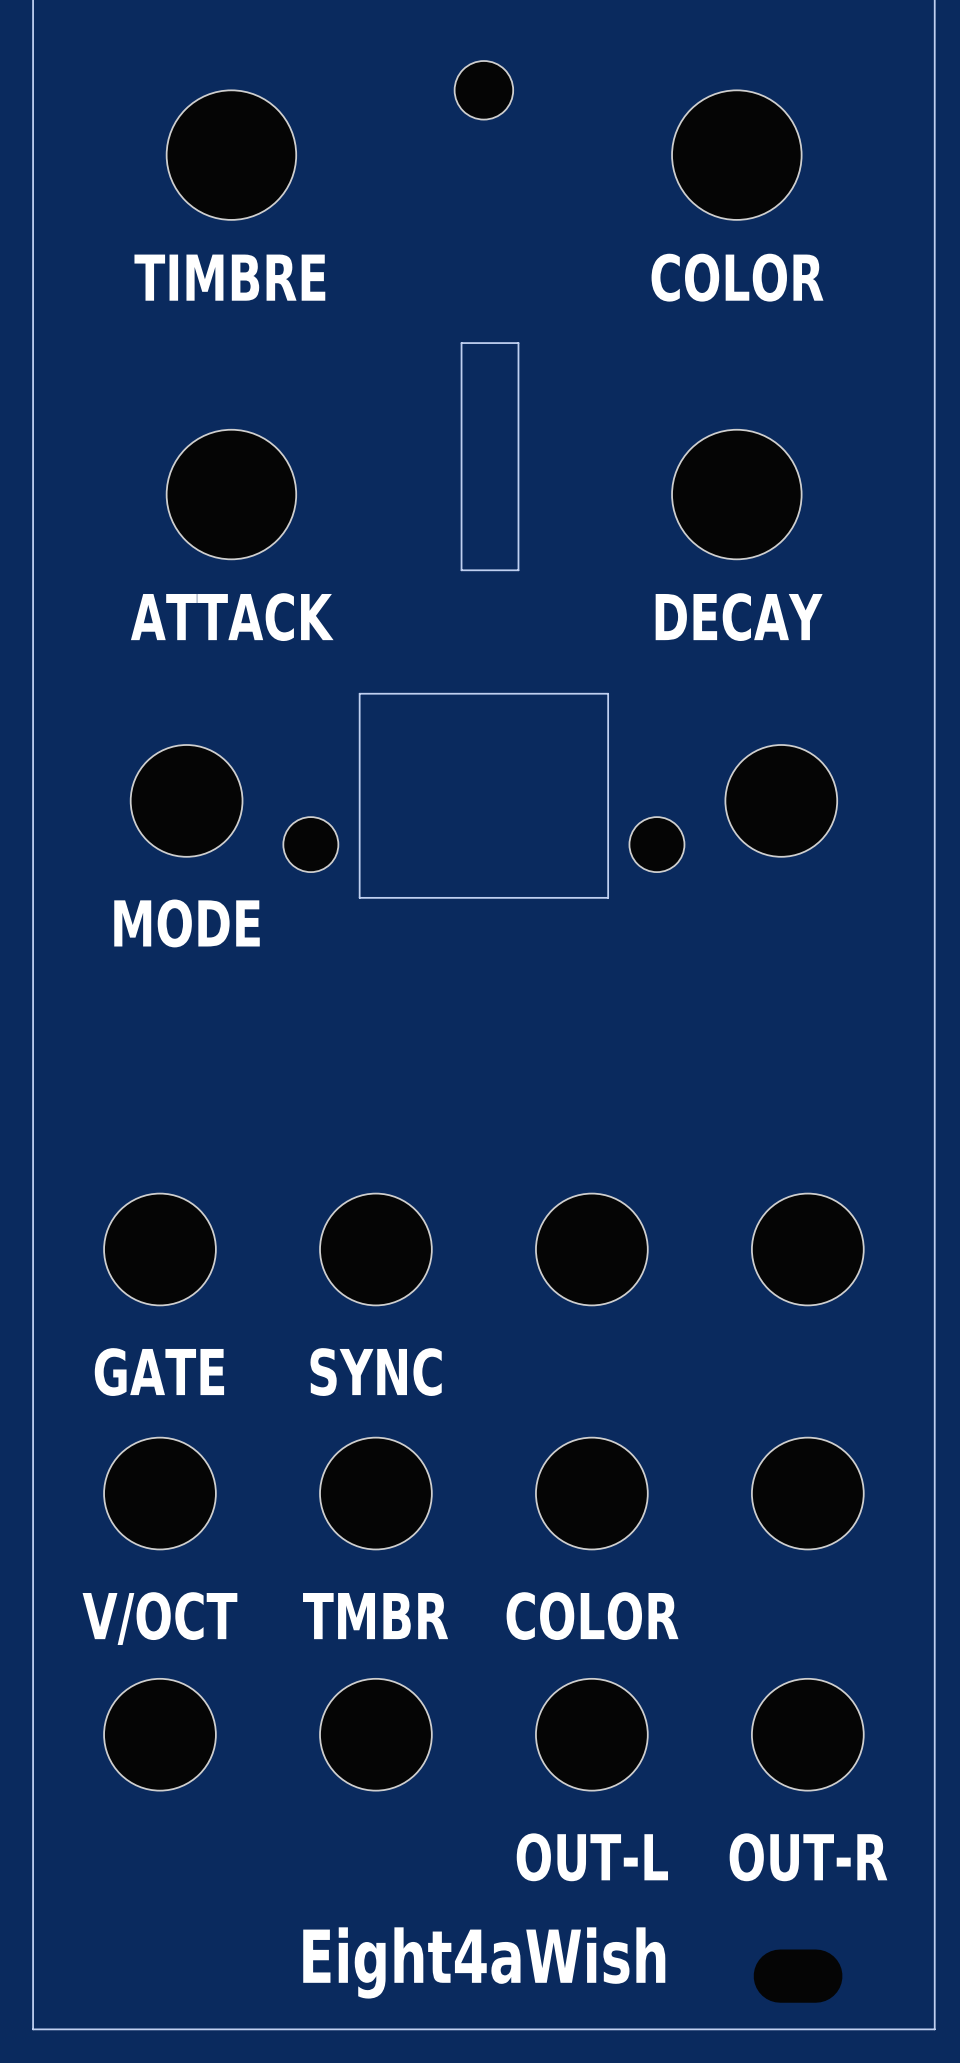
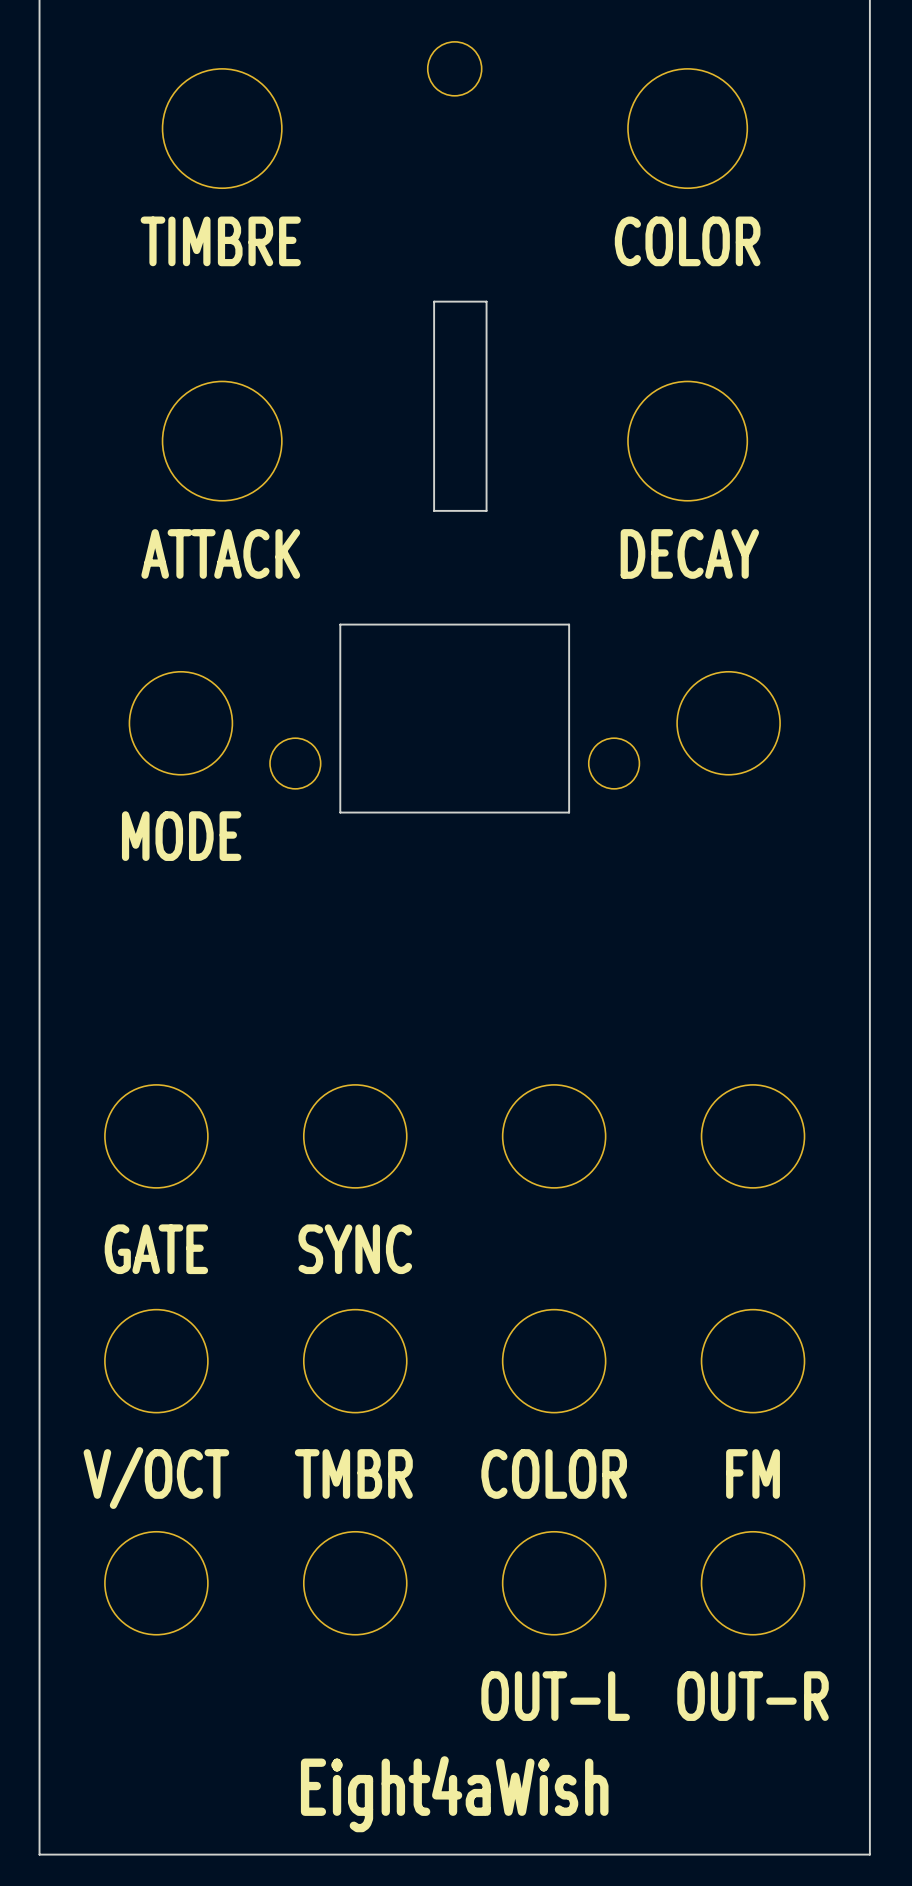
text: none -> FM (753, 1473)

